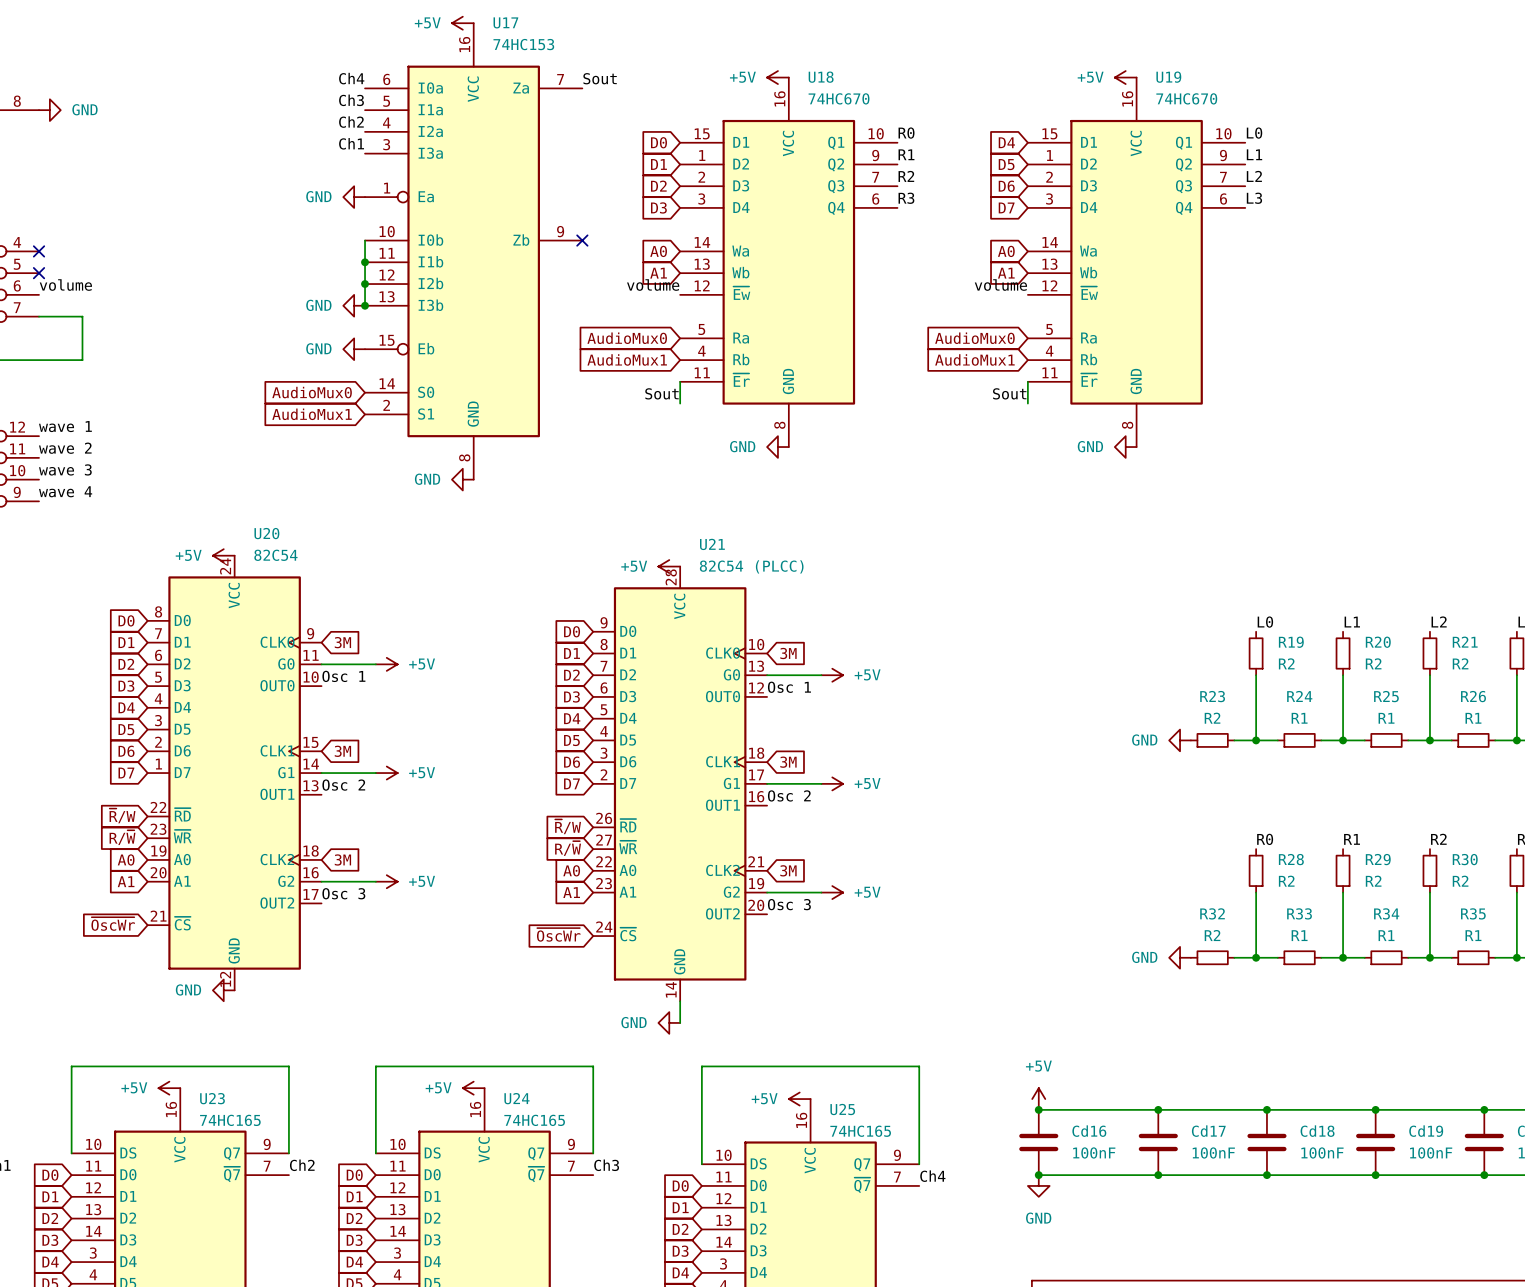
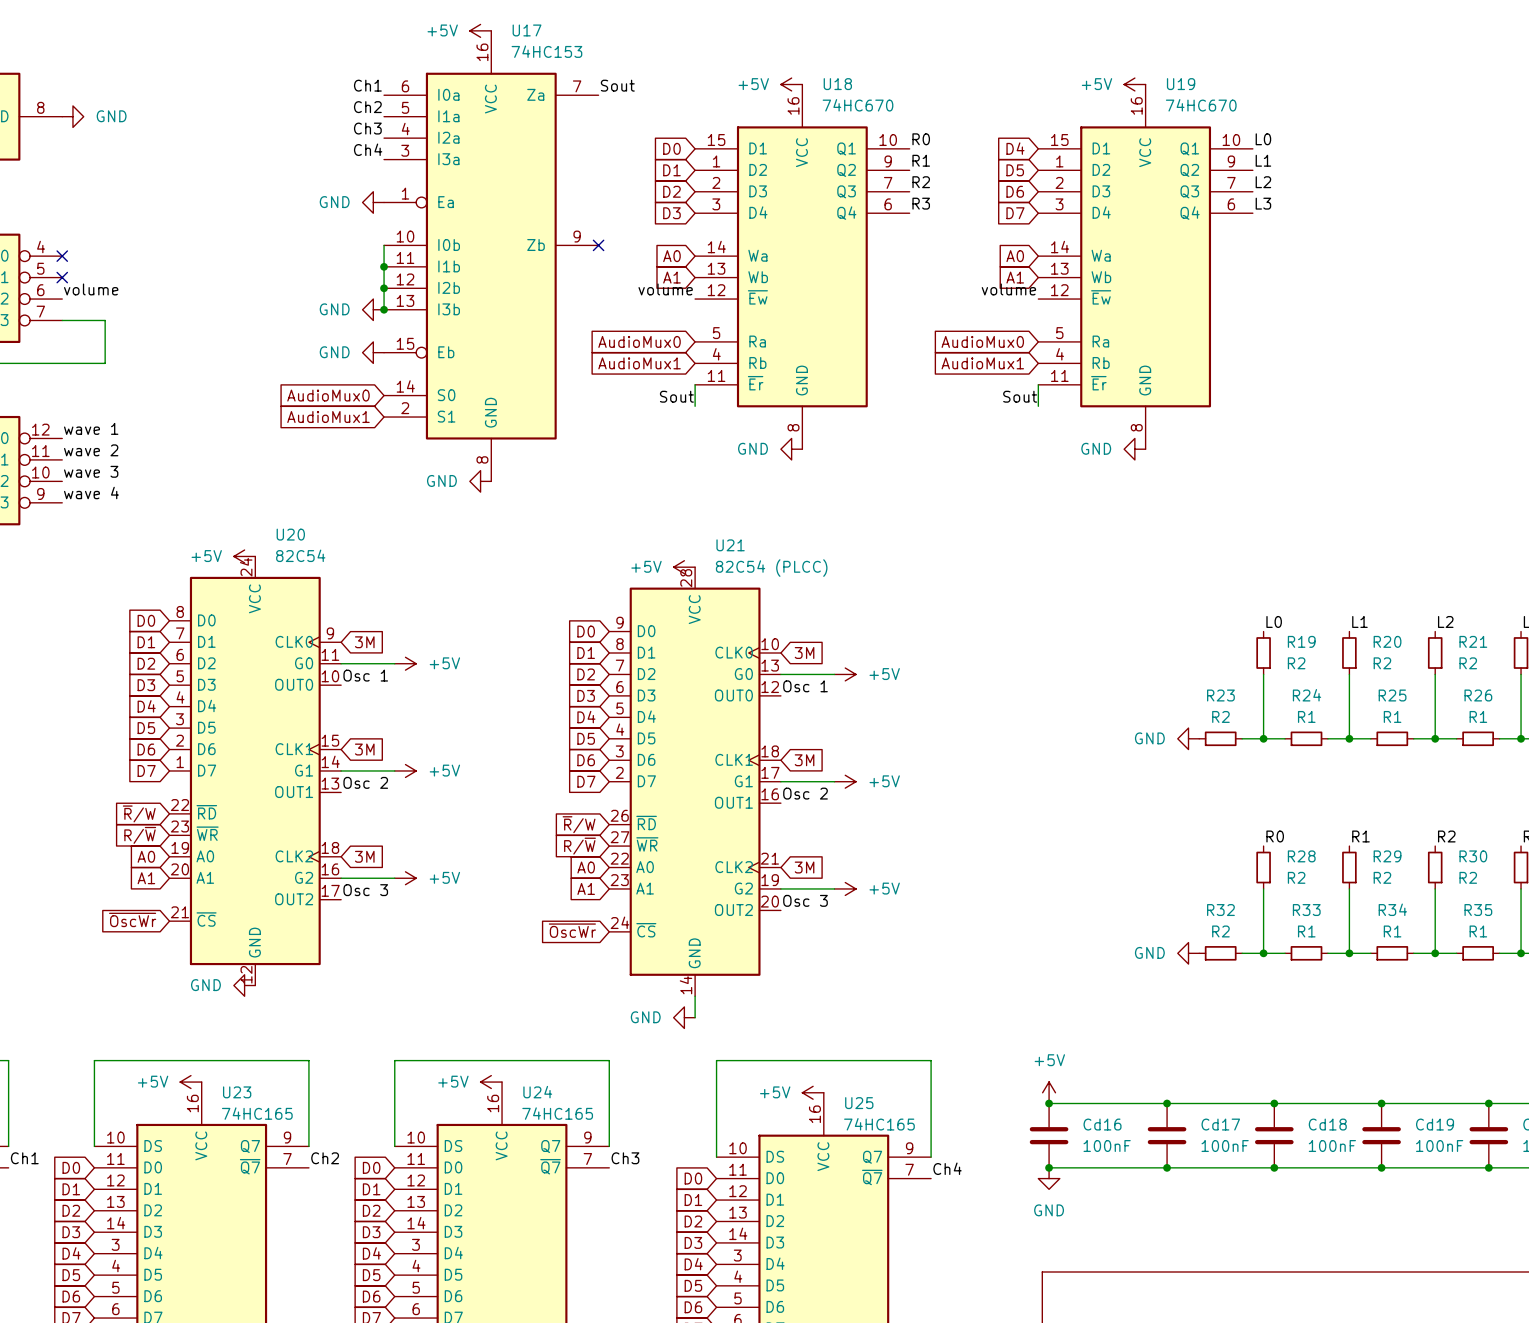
label: Ch4 (351, 78) -> Ch1 (367, 85)
label: Ch3 (351, 100) -> Ch2 (367, 107)
label: Ch2 (351, 122) -> Ch3 (367, 128)
label: Ch1 (351, 143) -> Ch4 (368, 149)

